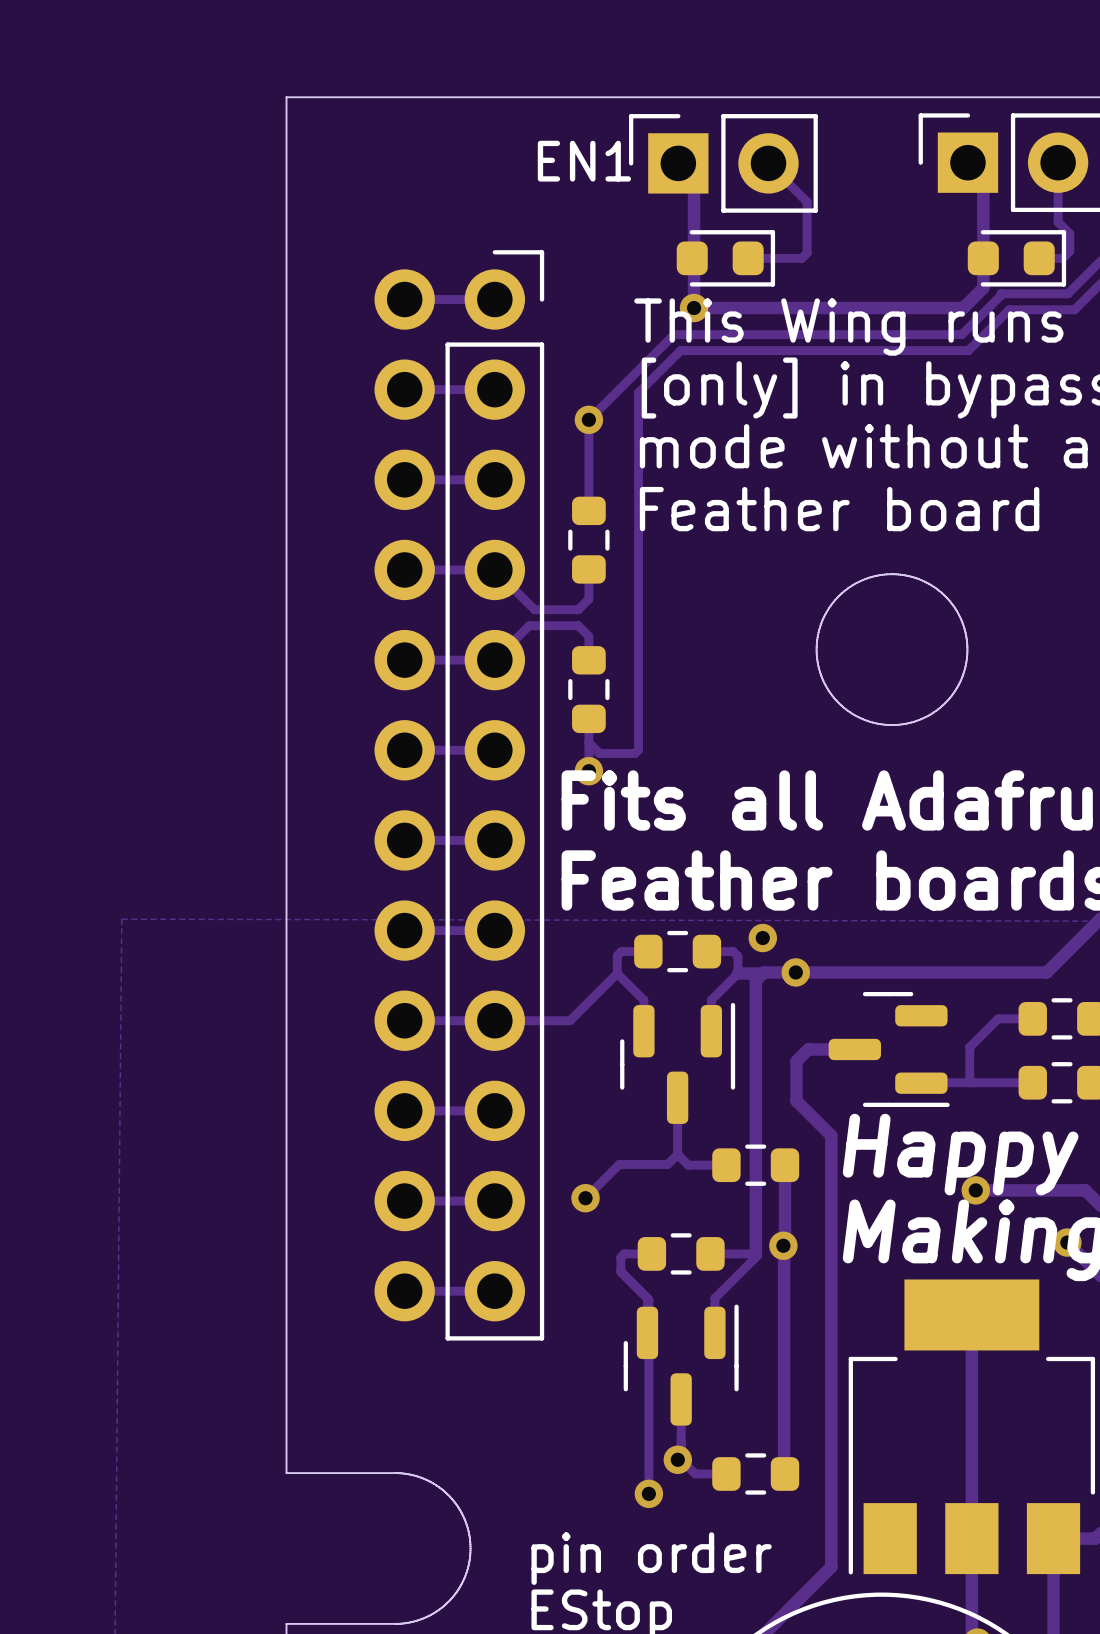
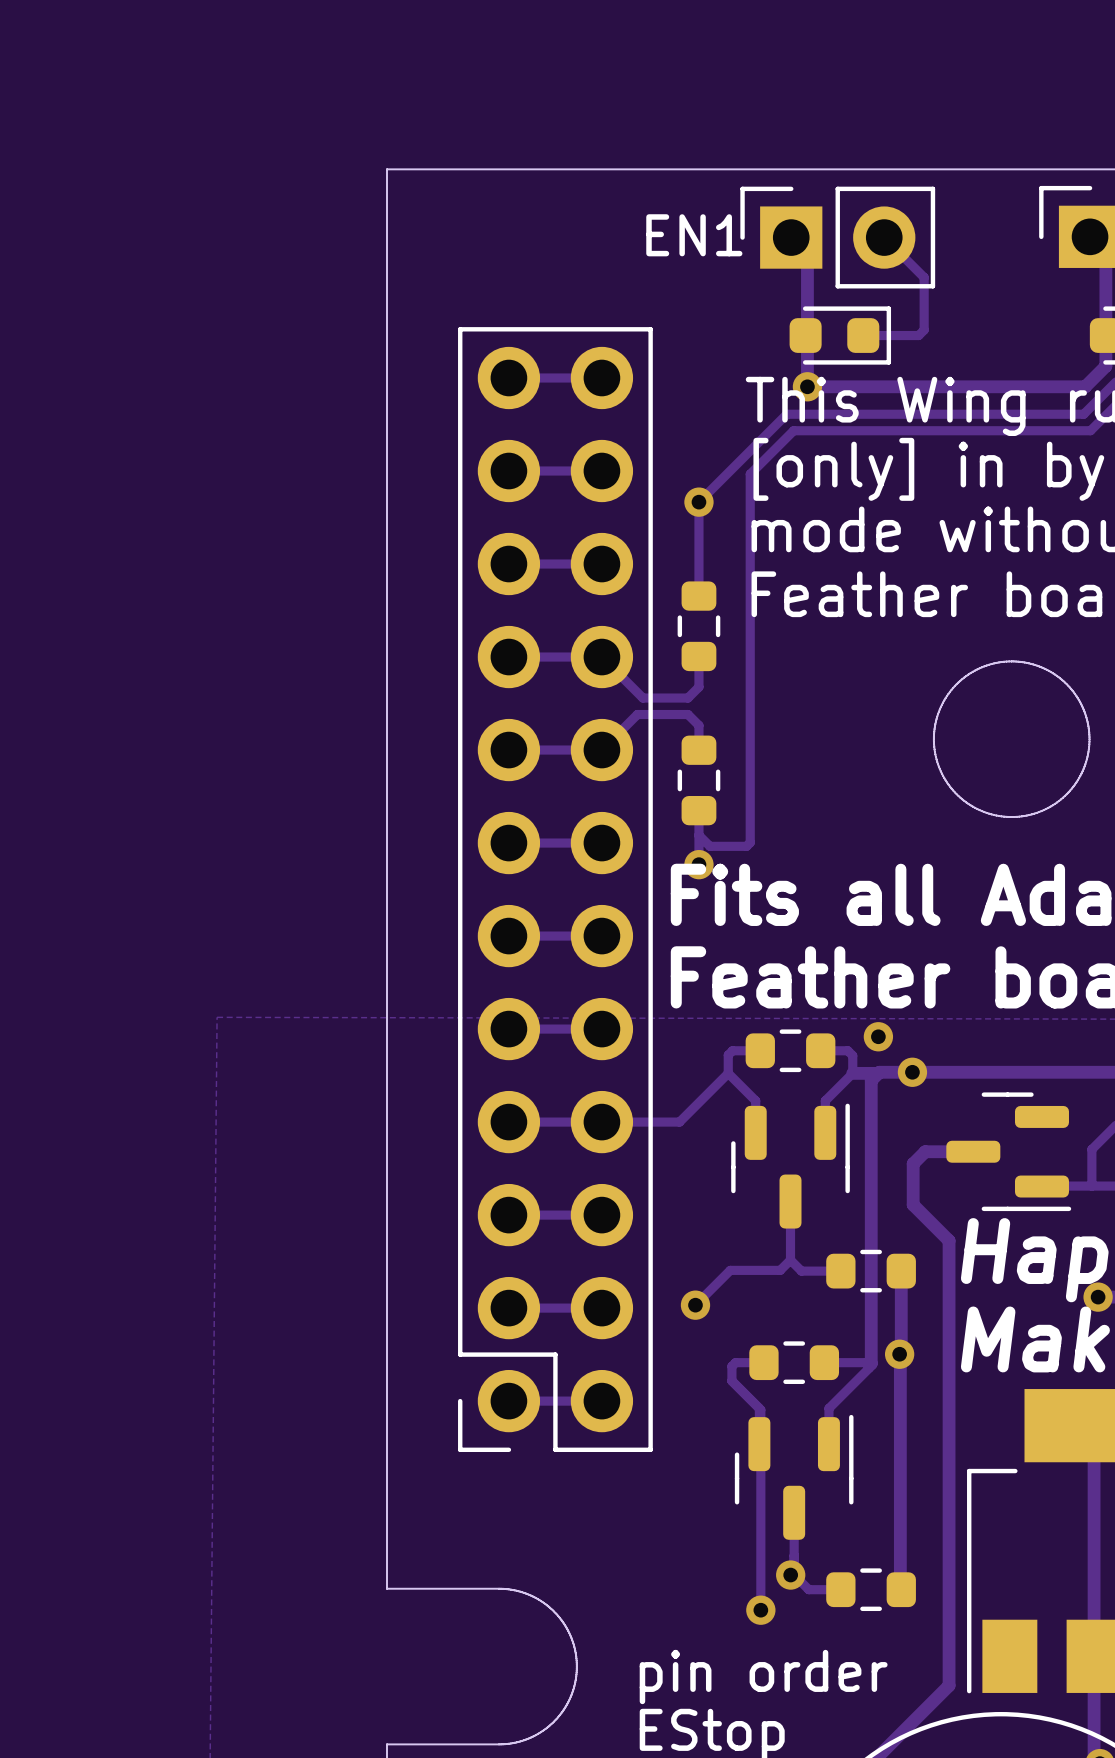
part: none -> (555, 889)
part: (494, 795) -> none

